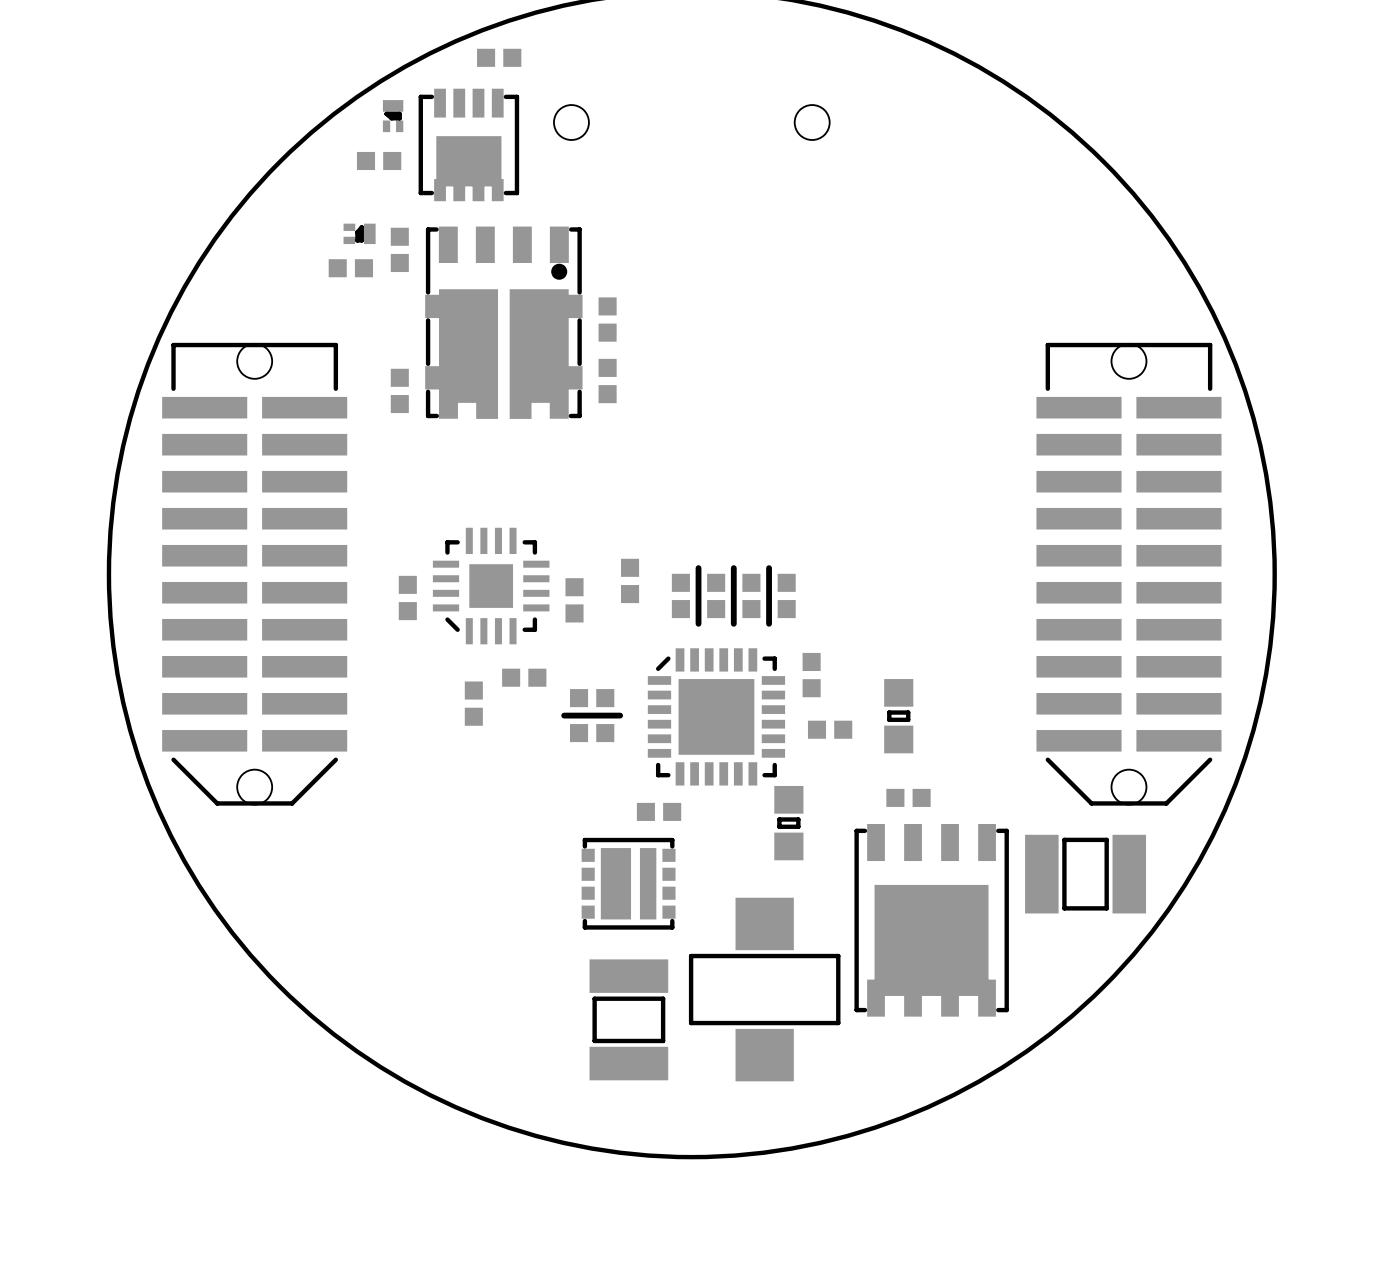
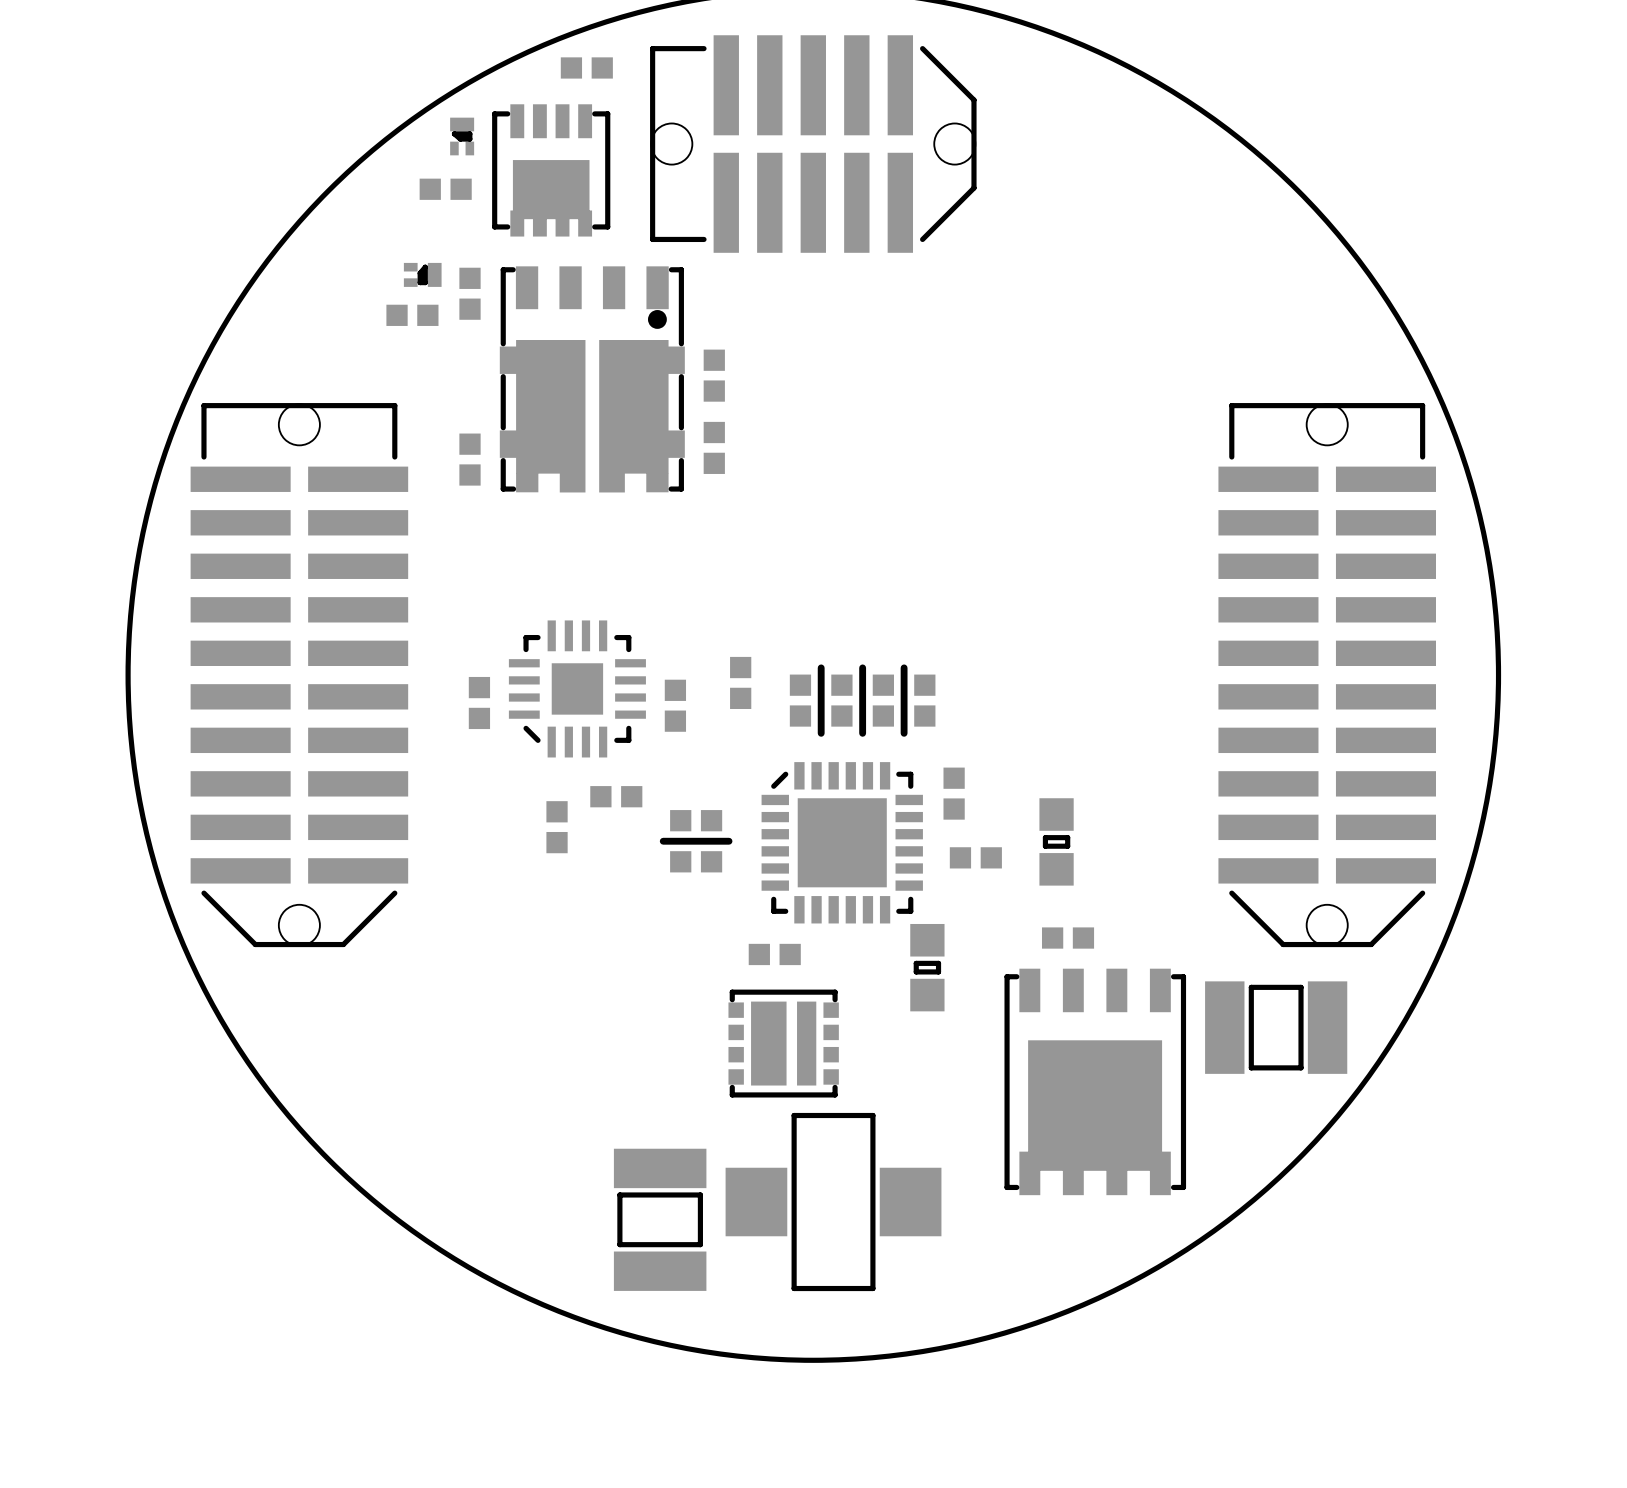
part: none -> (813, 144)
part position: (628, 883) -> (783, 1043)
part rotation: 0° (764, 989) -> 90° clockwise (833, 1202)
part position: (628, 1019) -> (660, 1219)

